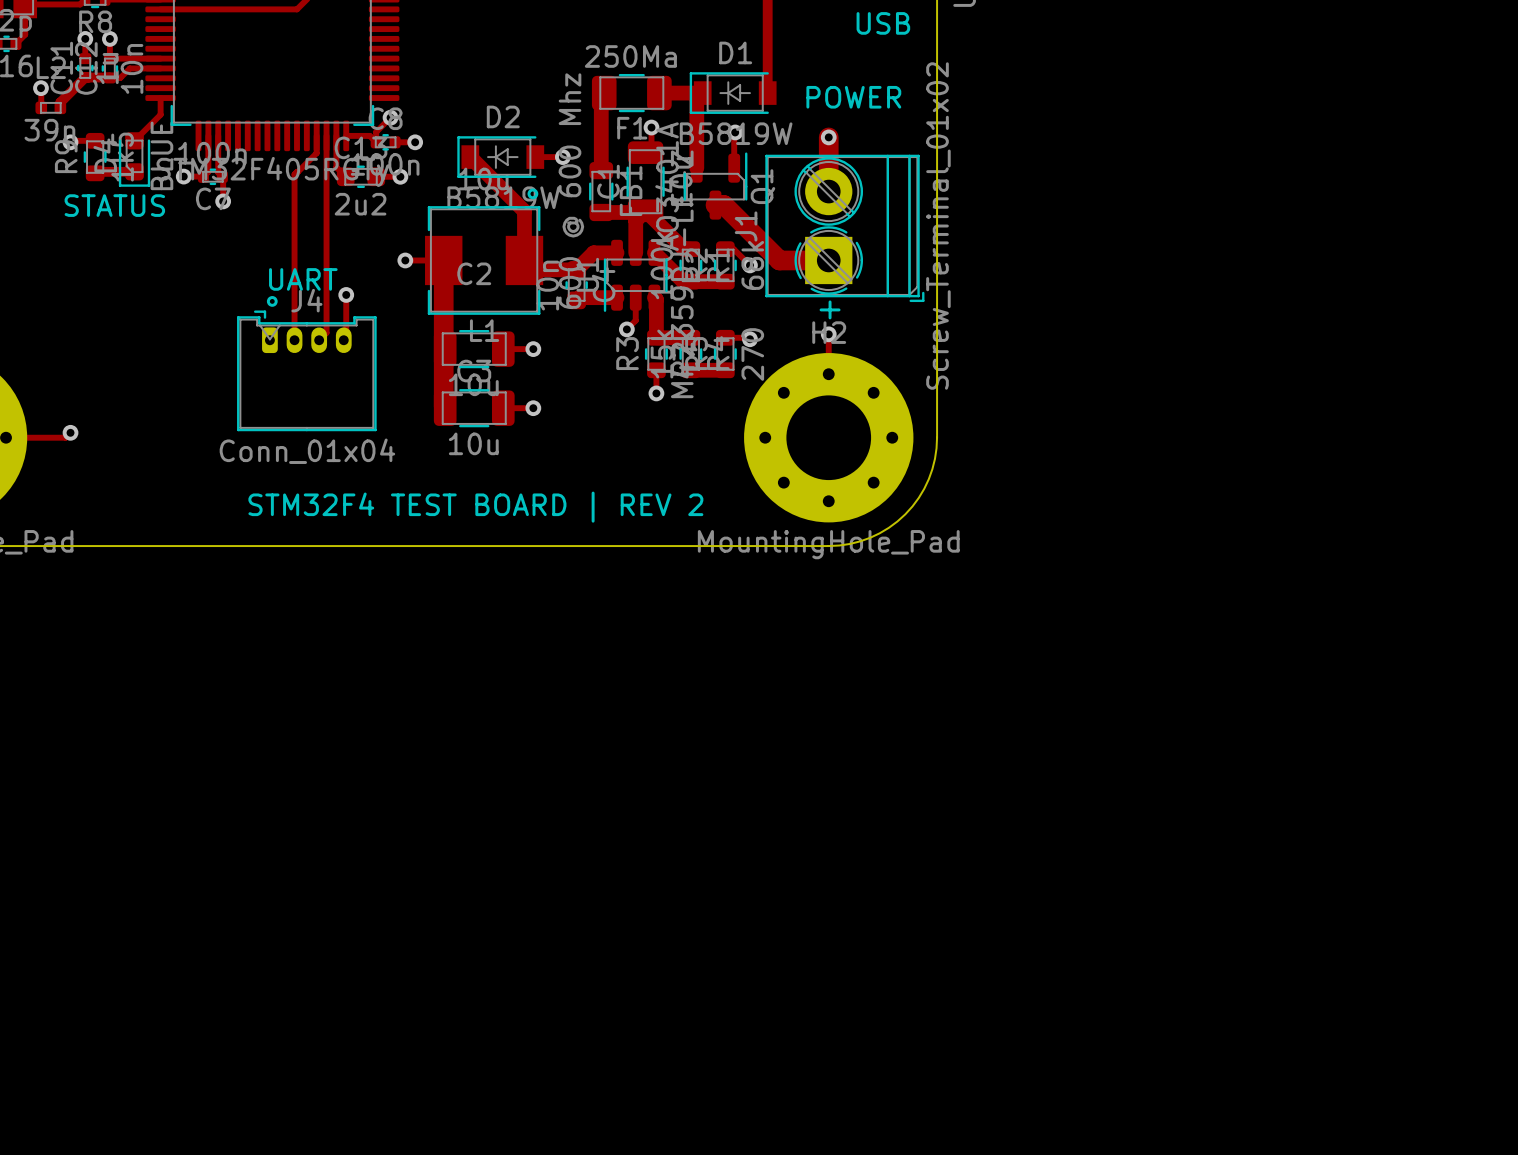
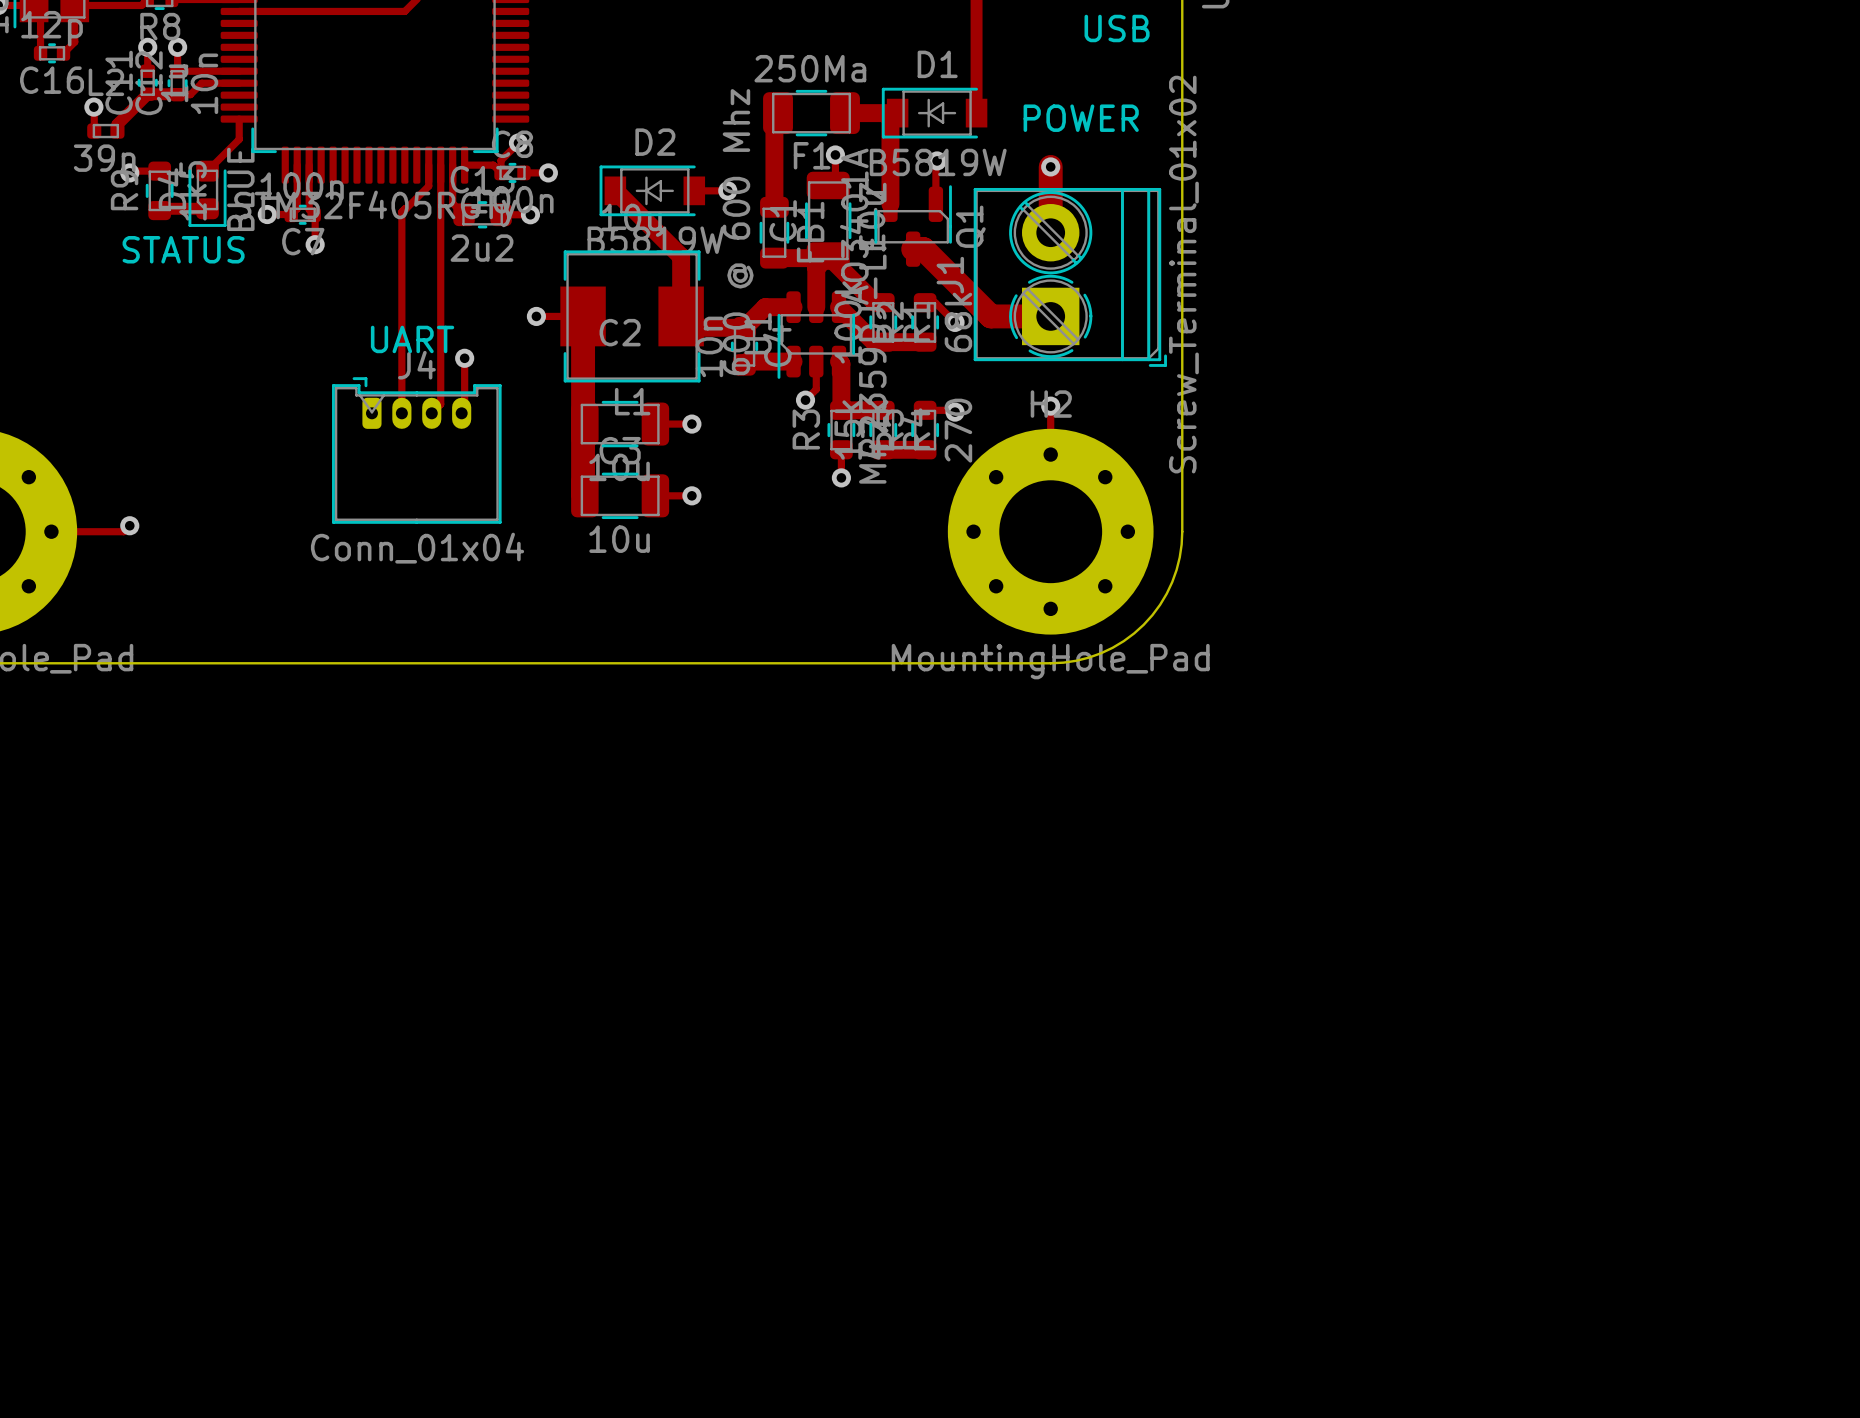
drawing: [527, 188, 539, 200] -> none
drawing: [266, 296, 278, 307] -> none
line: (830, 301) (830, 317) -> none
line: (821, 309) (839, 309) -> none
text: STM32F4 TEST BOARD | REV 2 (475, 507) -> none

